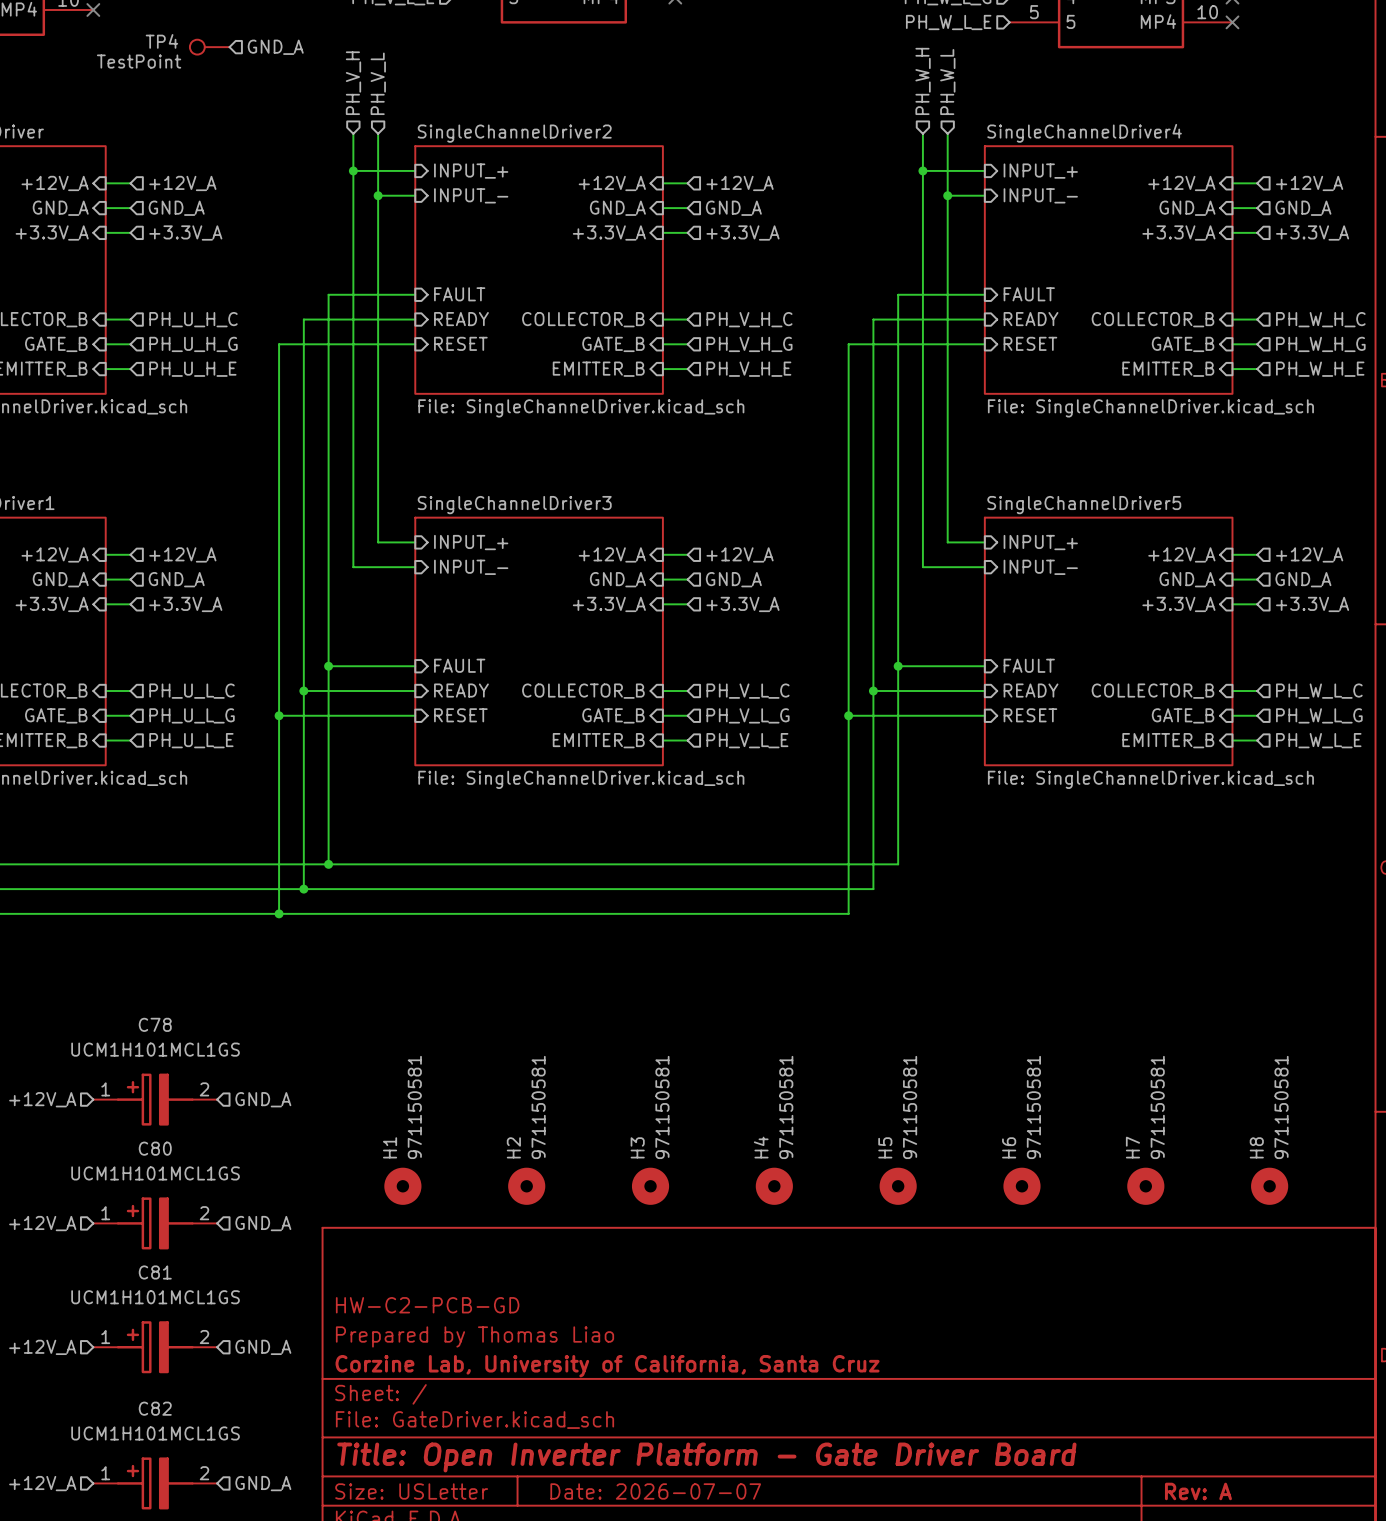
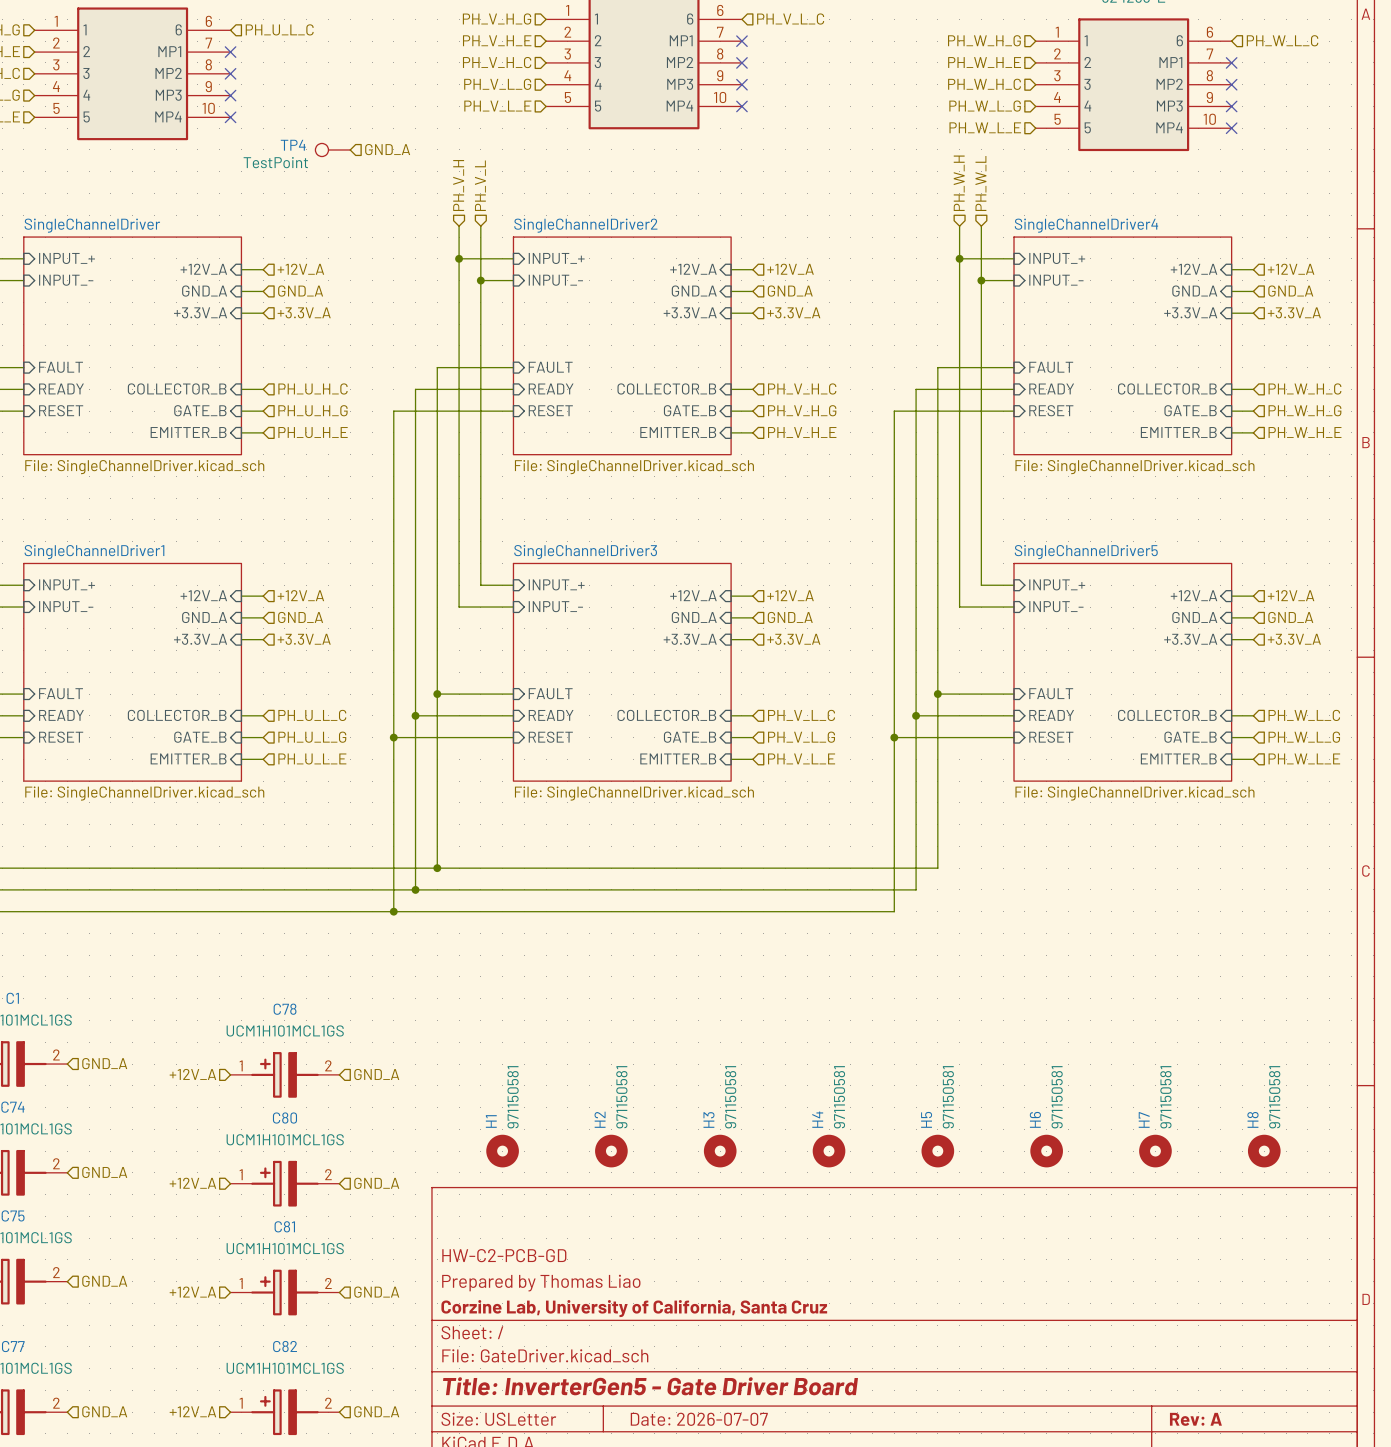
title block: Title: Open Inverter Platform - Gate Driver Board (706, 1457) -> Title: InverterGen5 - Gate Driver Board (650, 1386)

